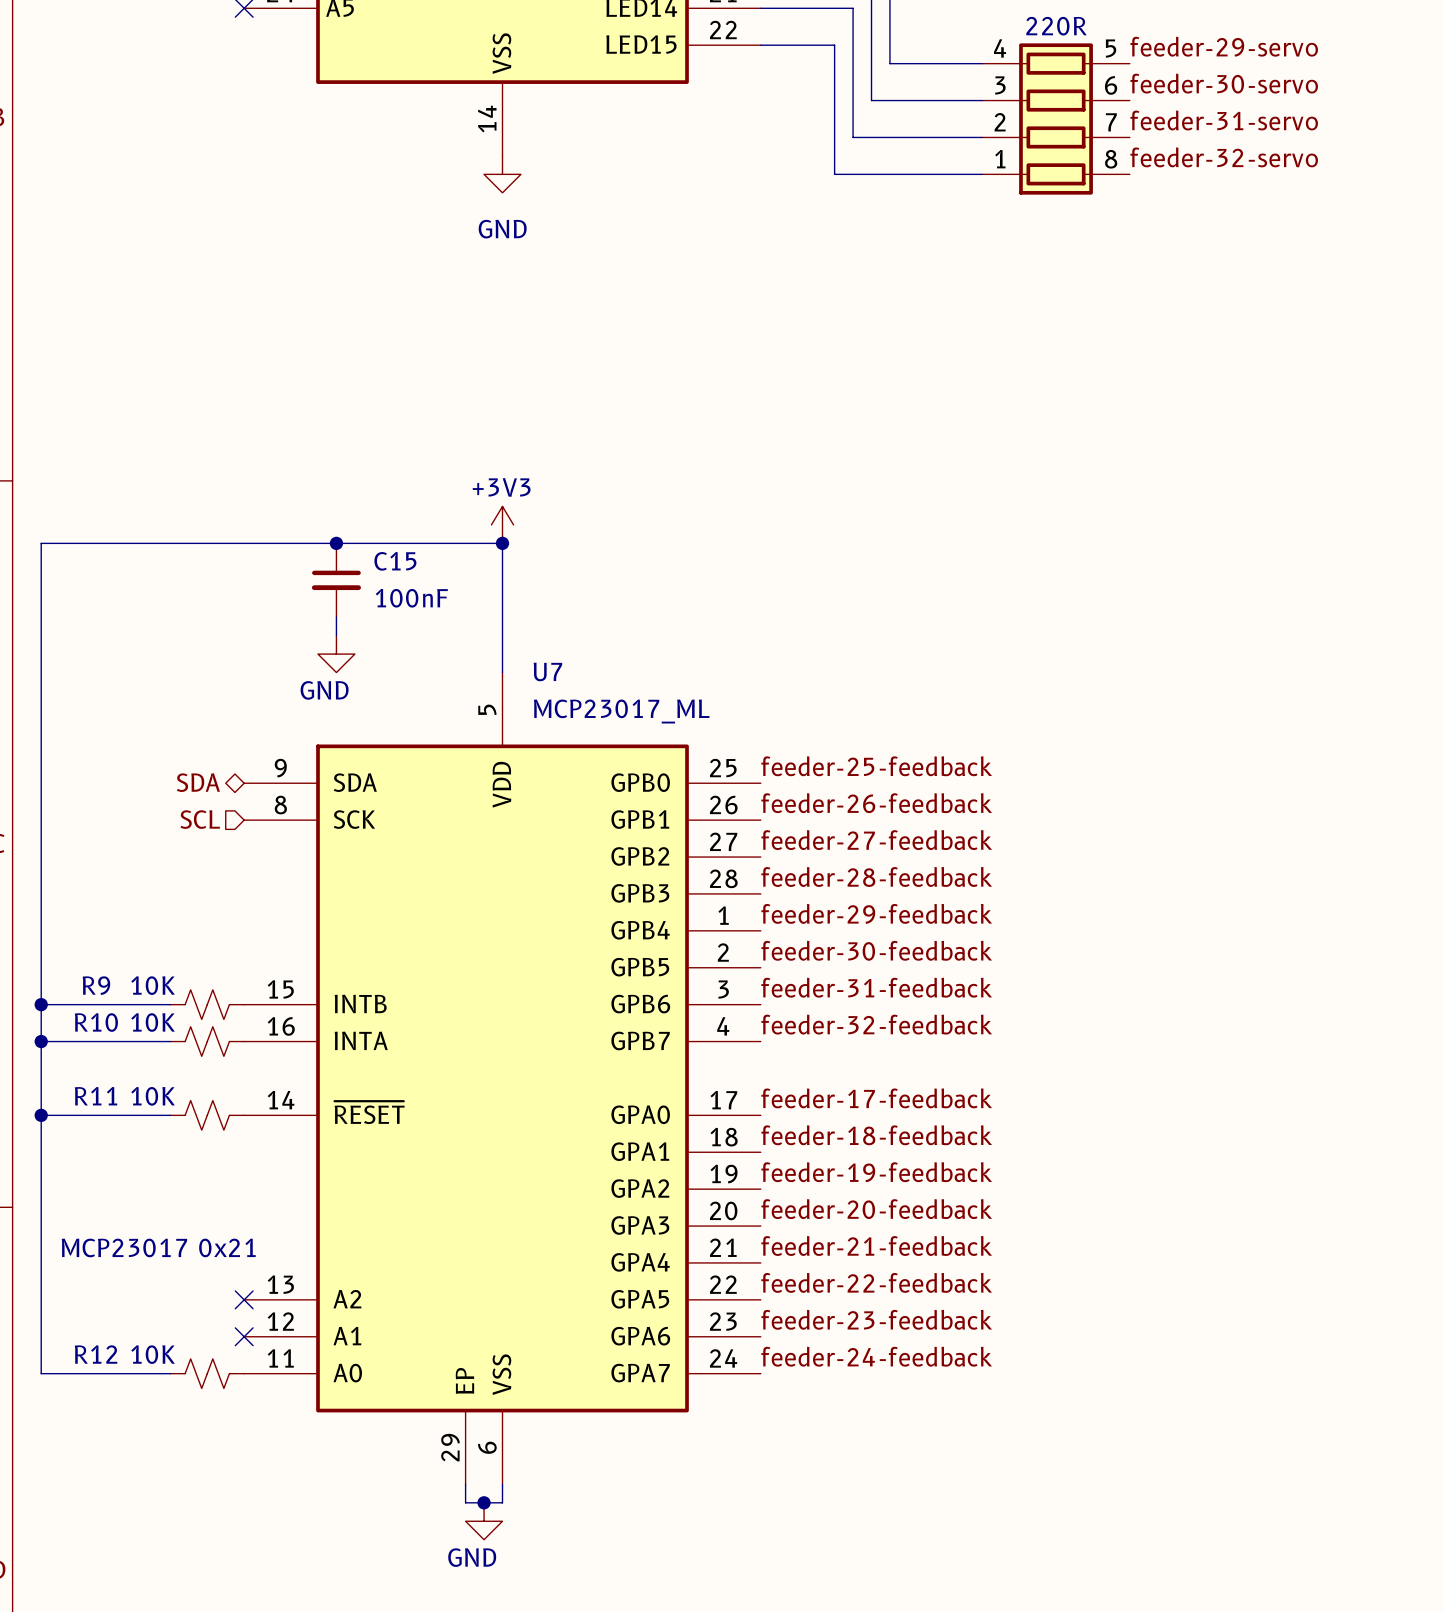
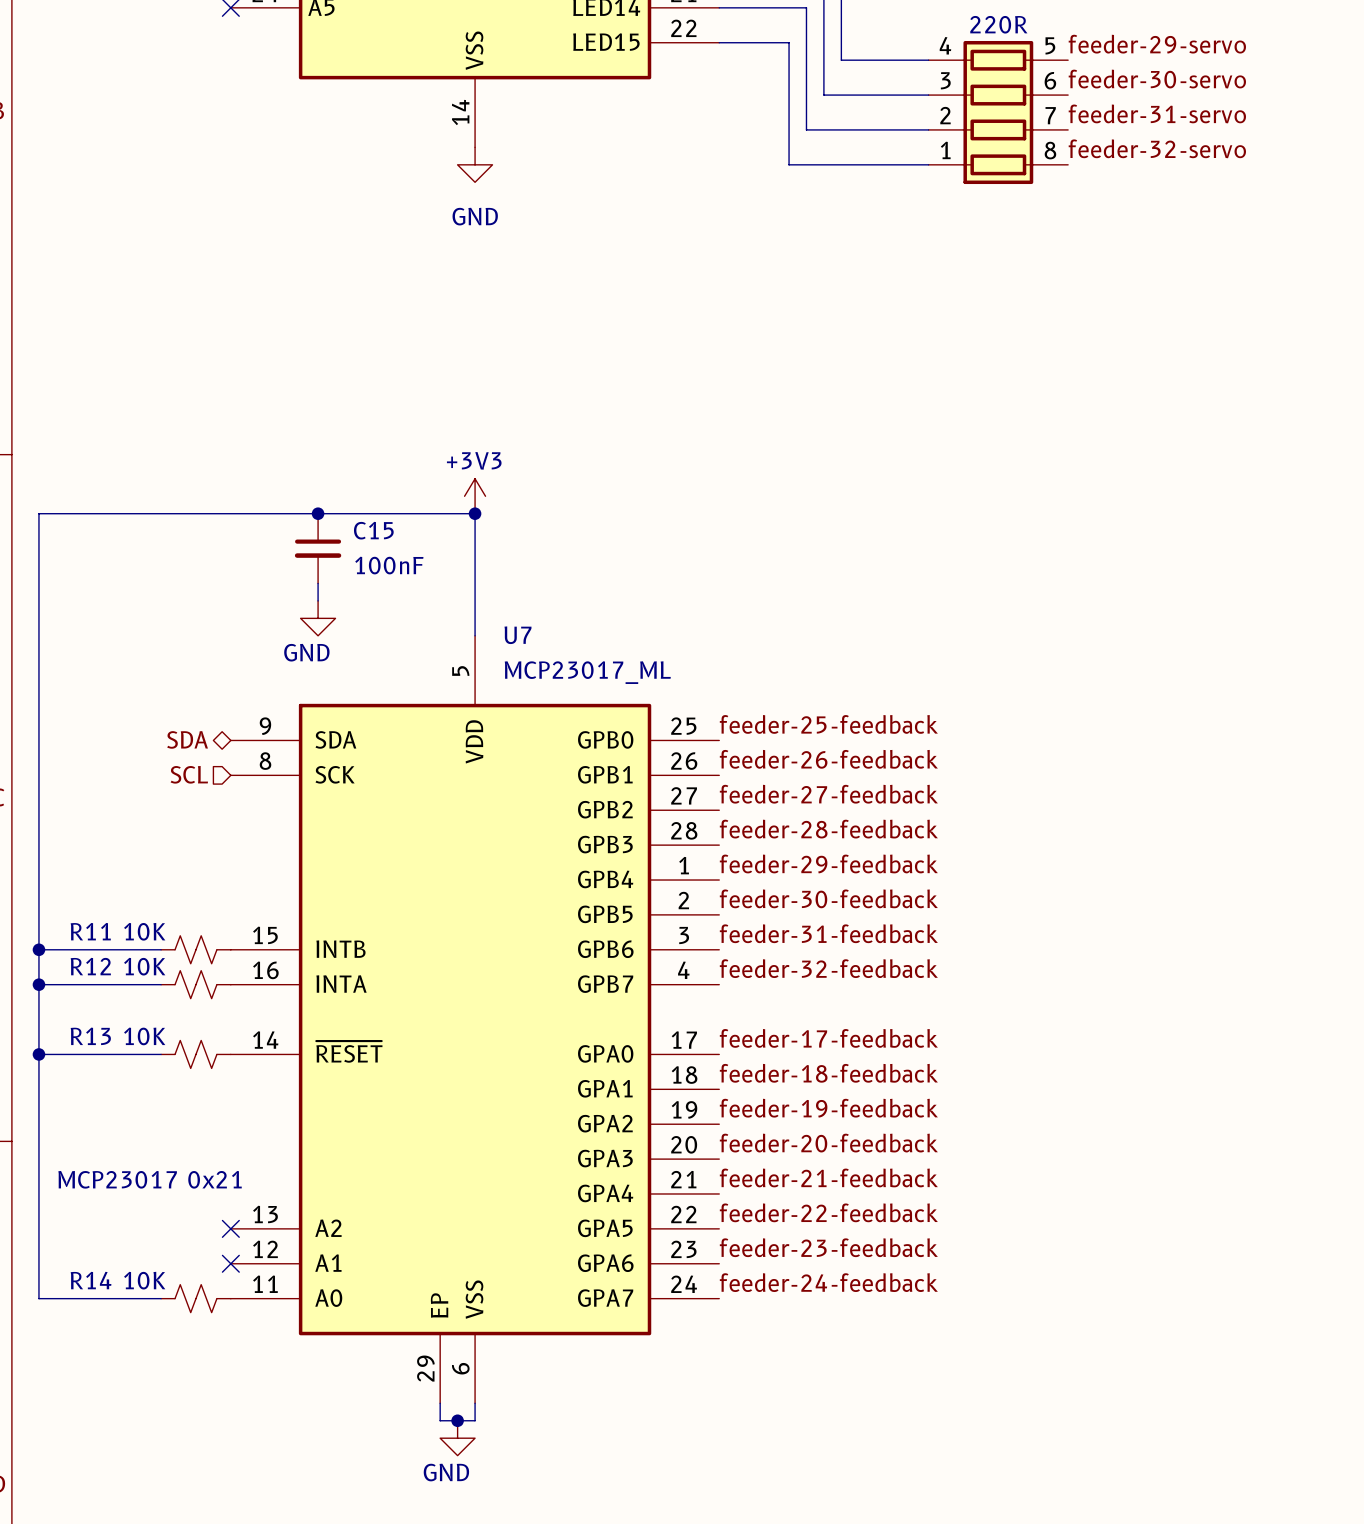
R9 name: R9 (96, 985) -> R11 (90, 931)
R10 name: R10 (96, 1022) -> R12 (90, 966)
R11 name: R11 (96, 1096) -> R13 (90, 1036)
R12 name: R12 (96, 1354) -> R14 (91, 1280)

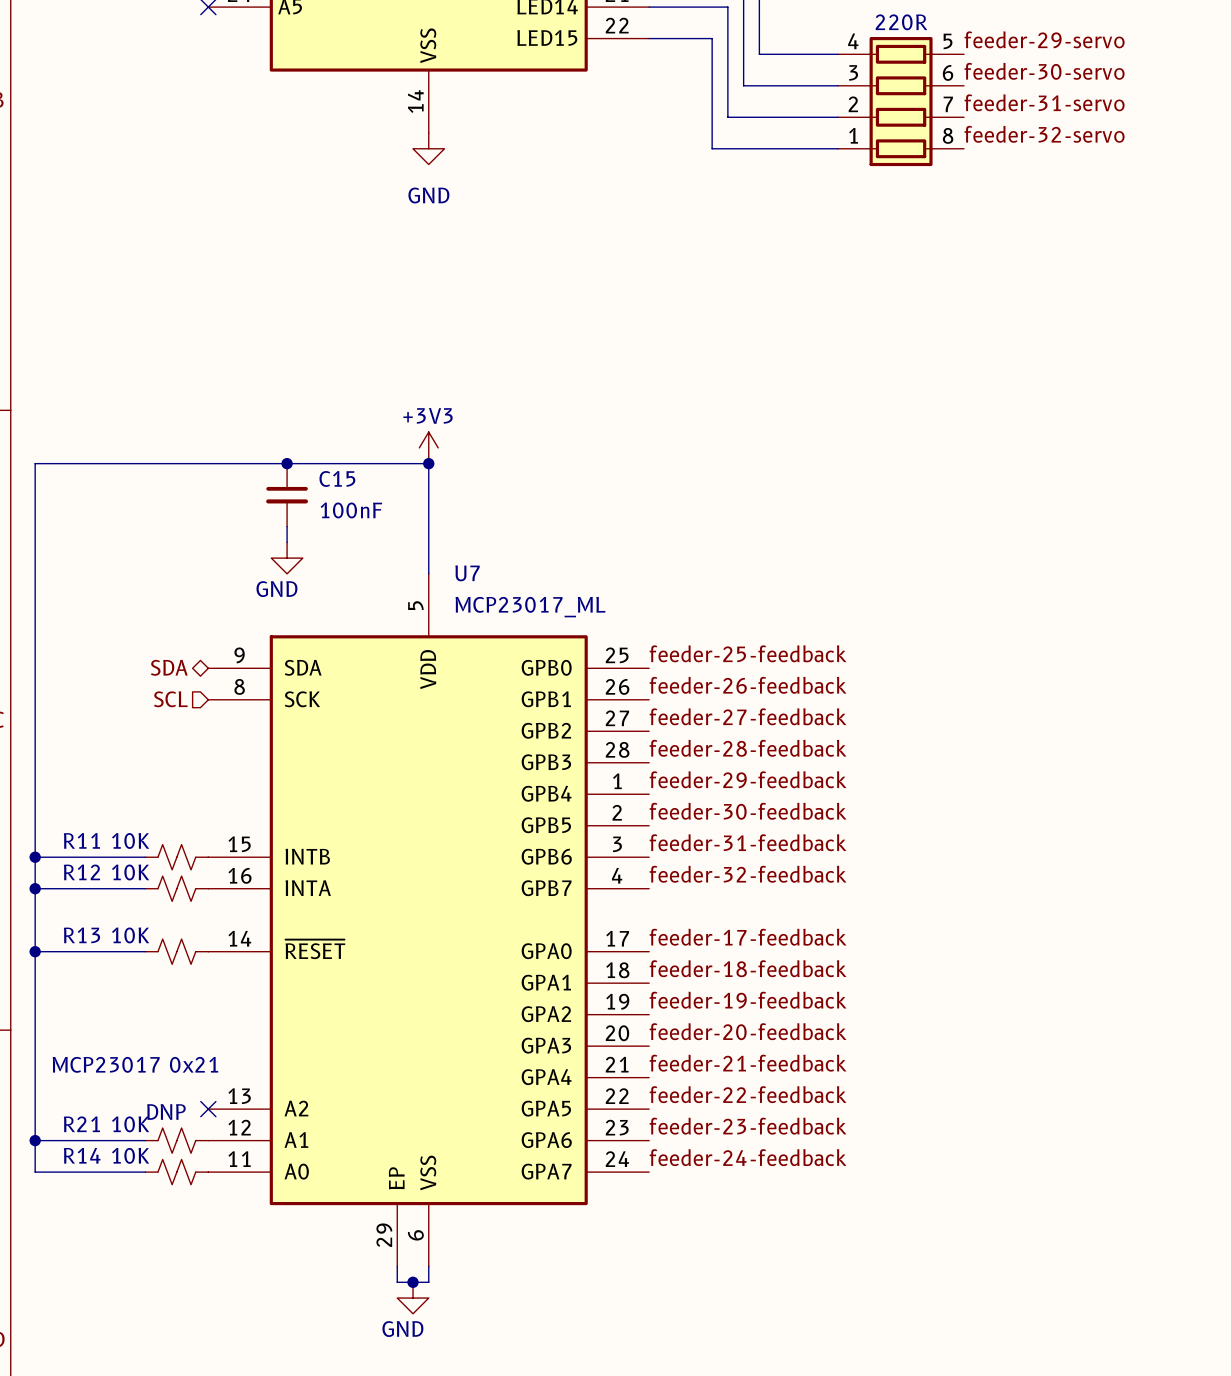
text: none -> DNP (166, 1111)
wire: none -> (35, 1140) (145, 1140)
junction: none -> (35, 1140)
R21: none -> 10K (176, 1140)
no-connect mark: (230, 1263) -> none

